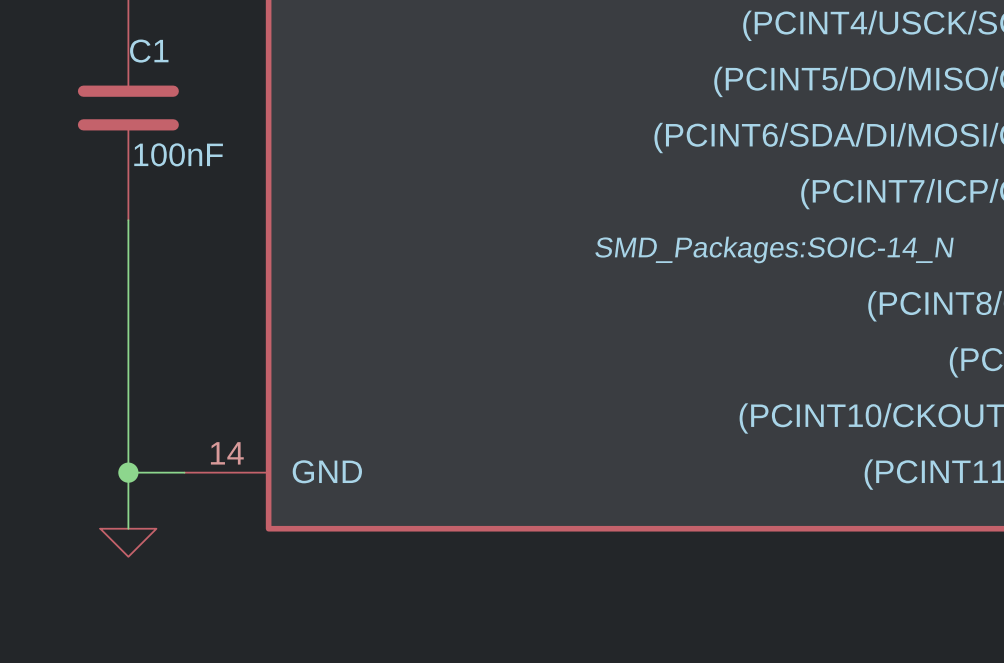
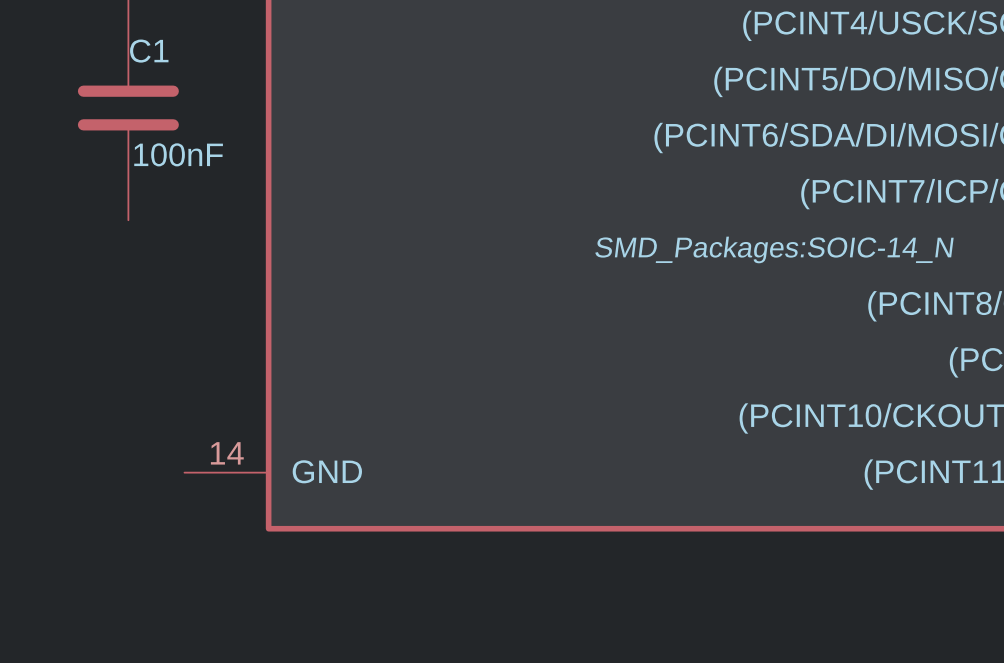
wire: (128, 220) (128, 528) -> none
wire: (128, 472) (184, 472) -> none
junction: (128, 472) -> none
power symbol: (128, 542) -> none

